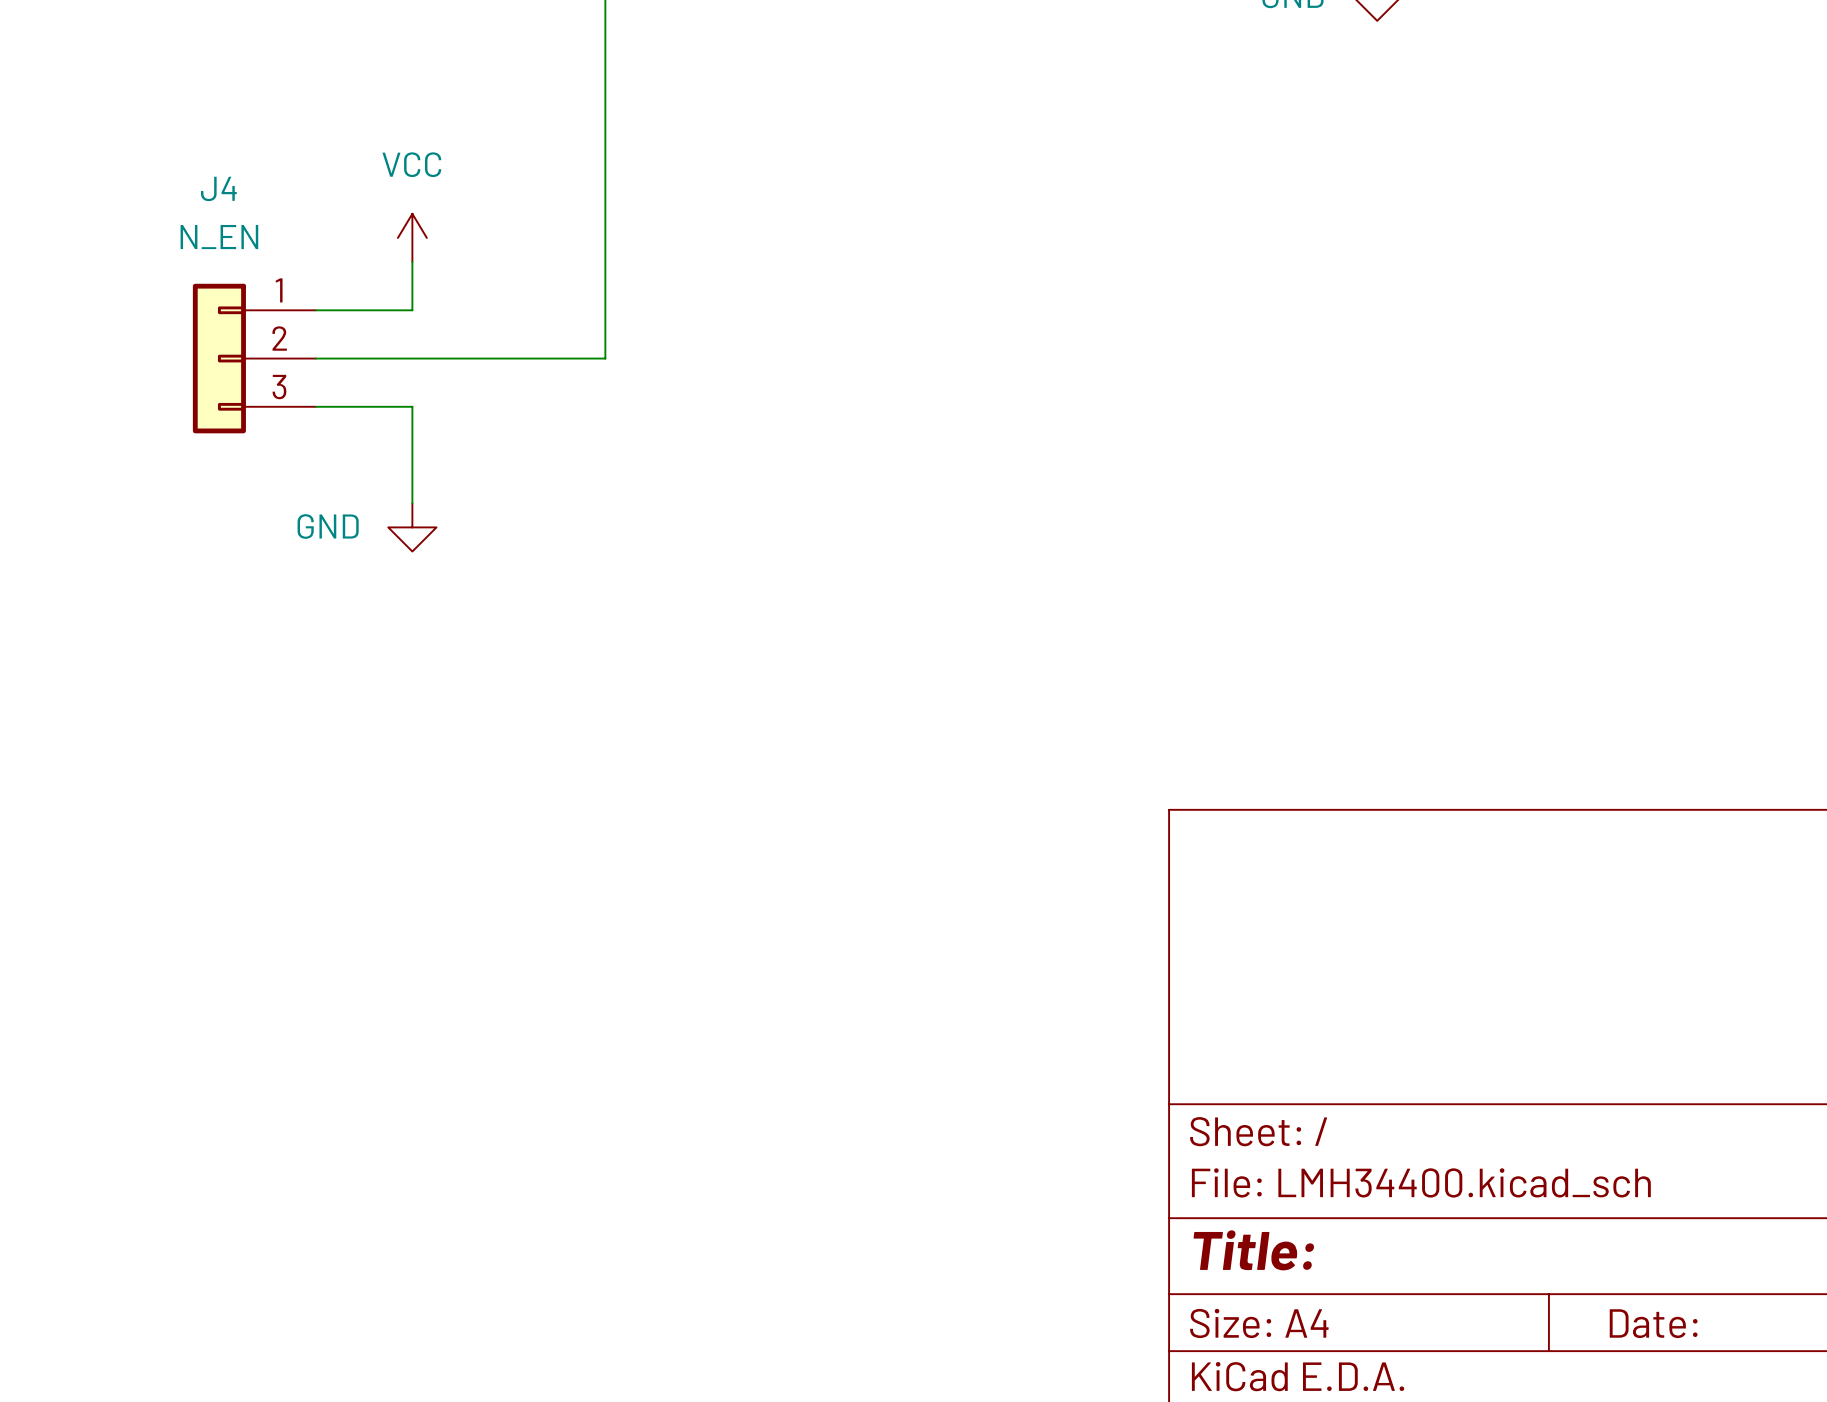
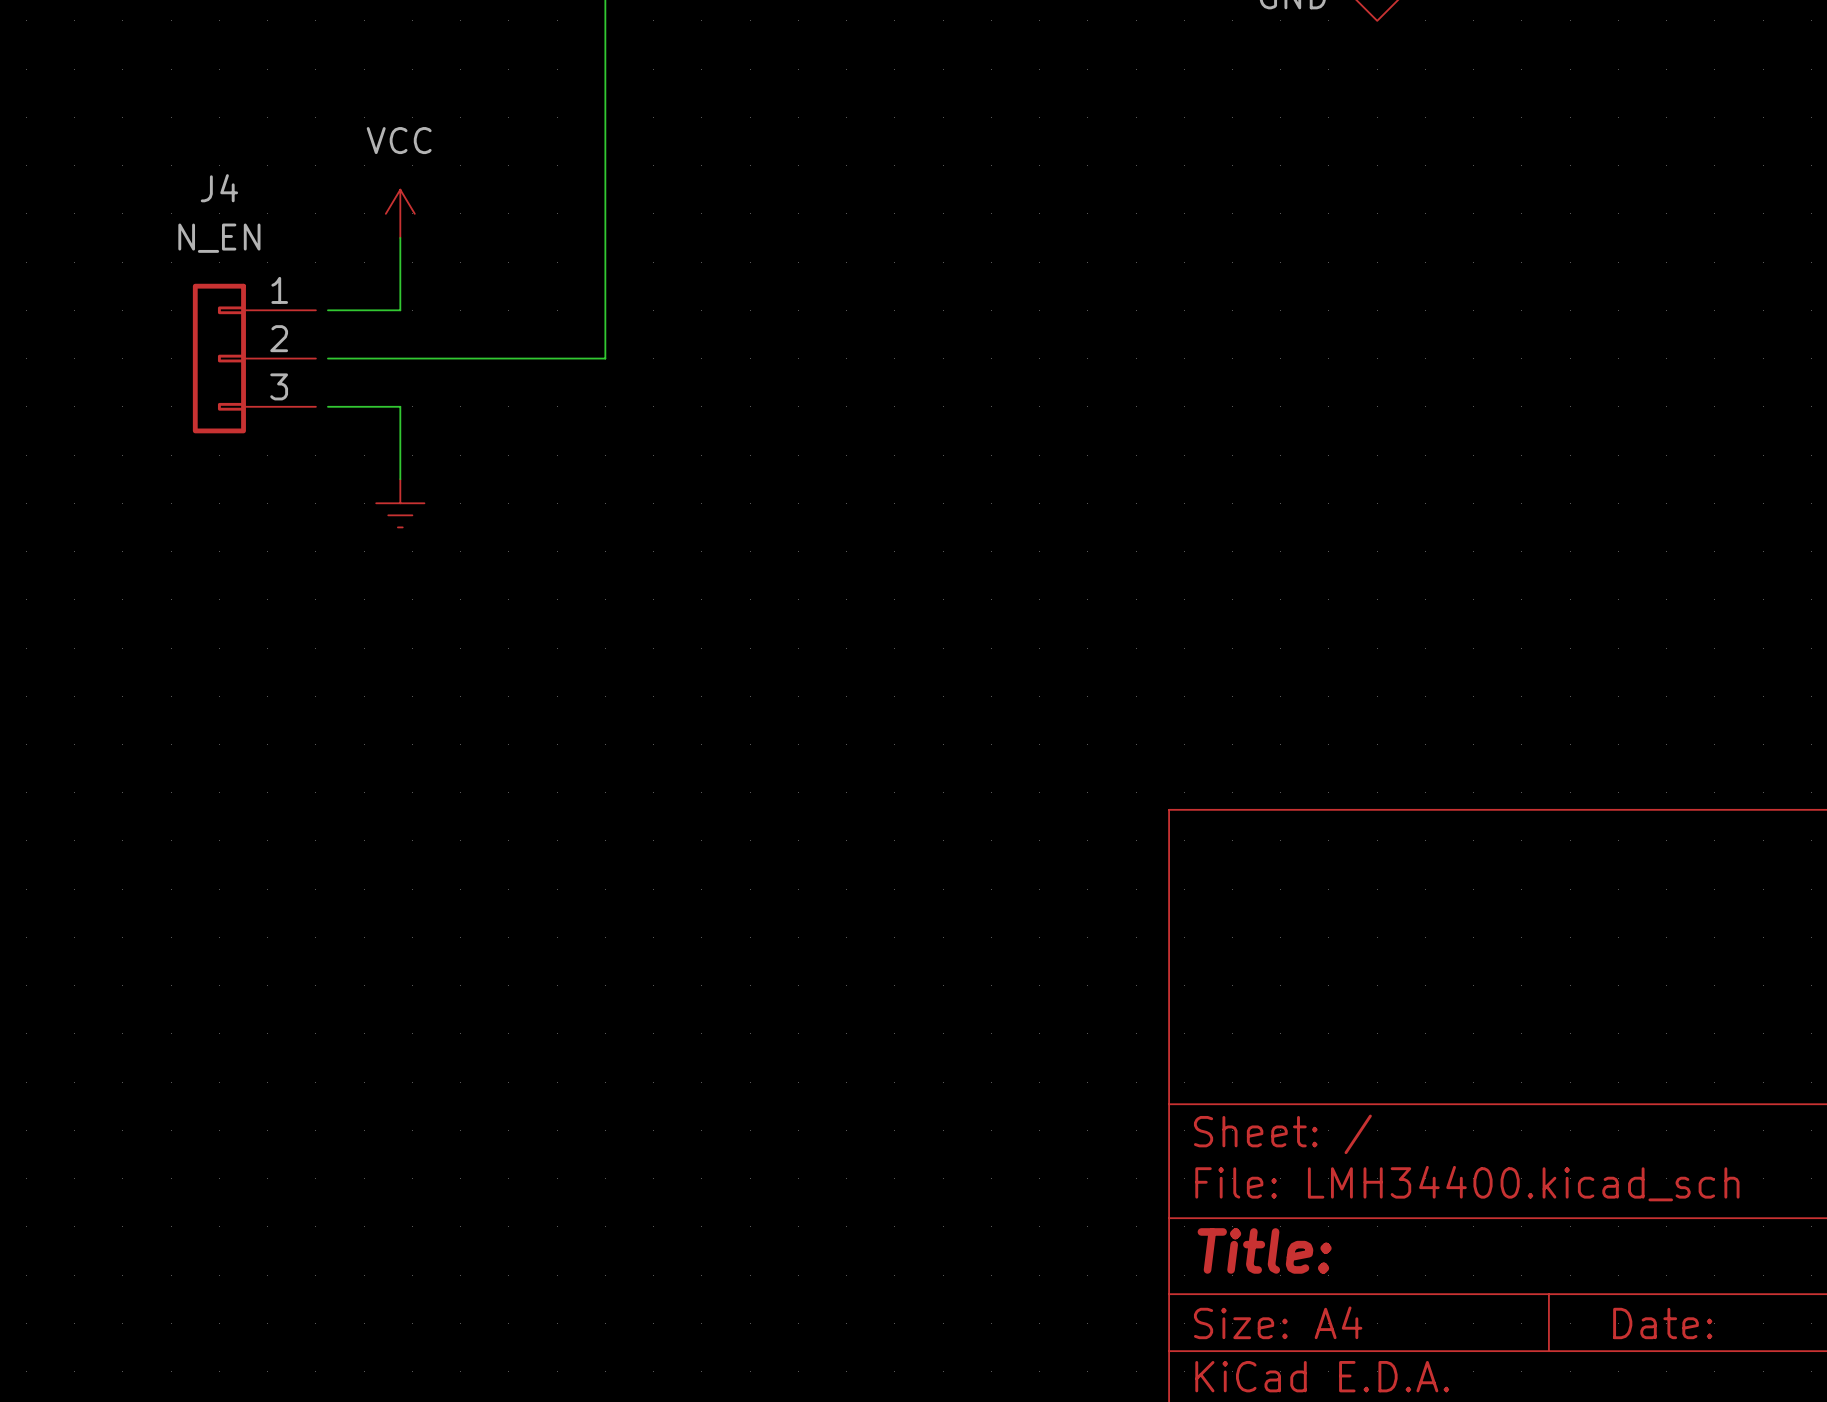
power symbol position: VCC (412, 237) -> VCC (400, 213)
wire: (412, 262) (412, 310) (400, 310) -> (400, 237) (400, 310)
wire: (315, 310) (327, 310) -> none
wire: (315, 358) (327, 358) -> none
wire: (315, 406) (327, 406) -> none
wire: (400, 406) (412, 406) (412, 503) -> (400, 406) (400, 479)
power symbol: none -> (400, 503)
power symbol: GND (412, 527) -> none

